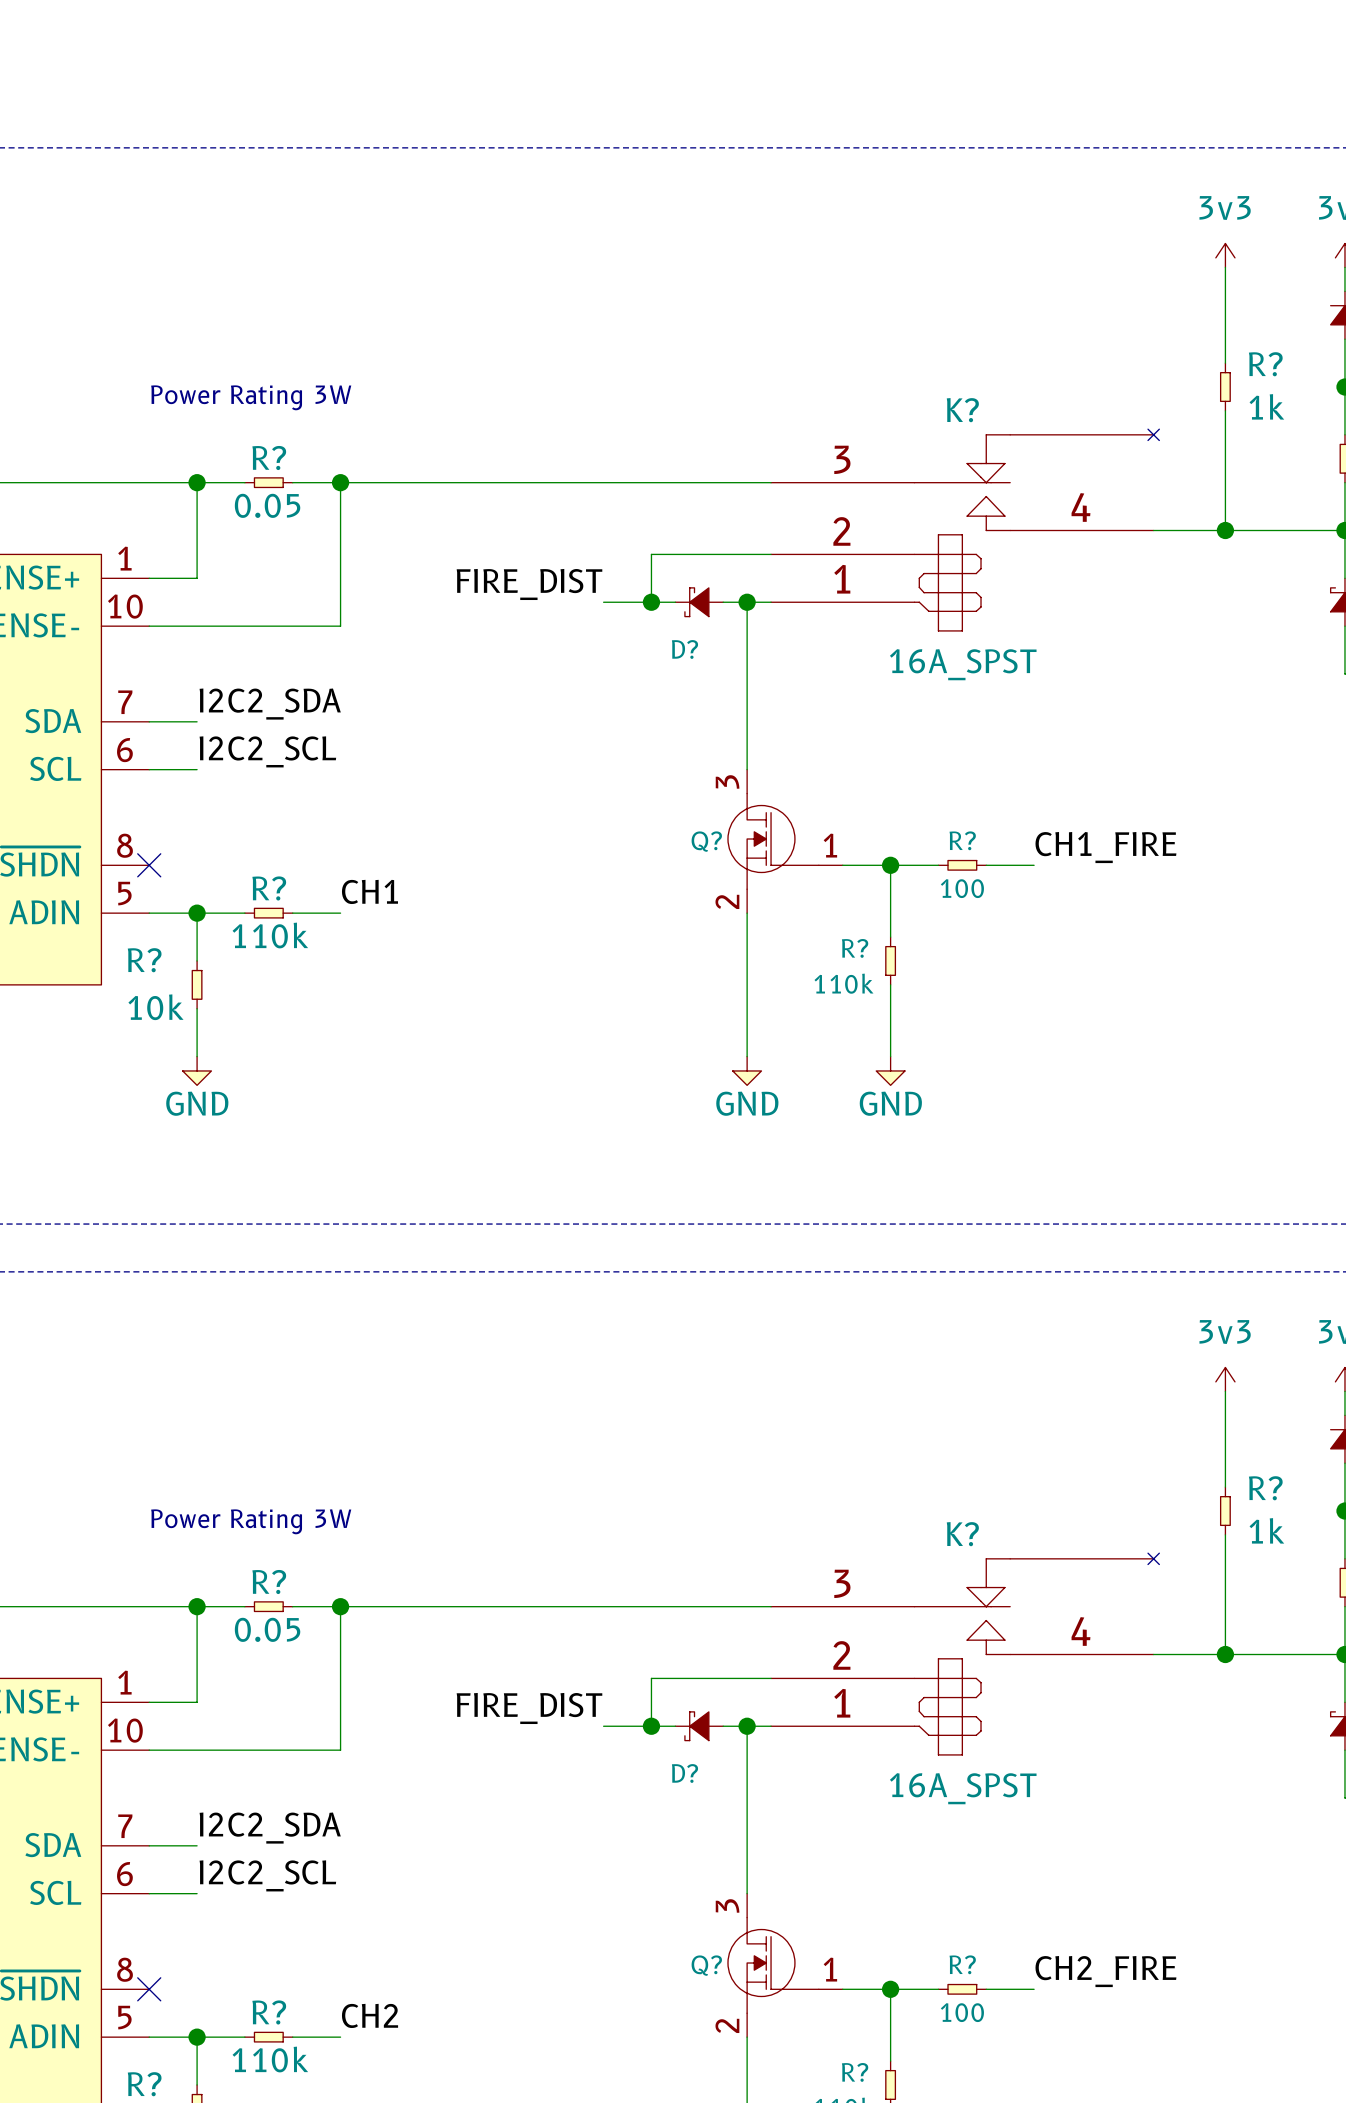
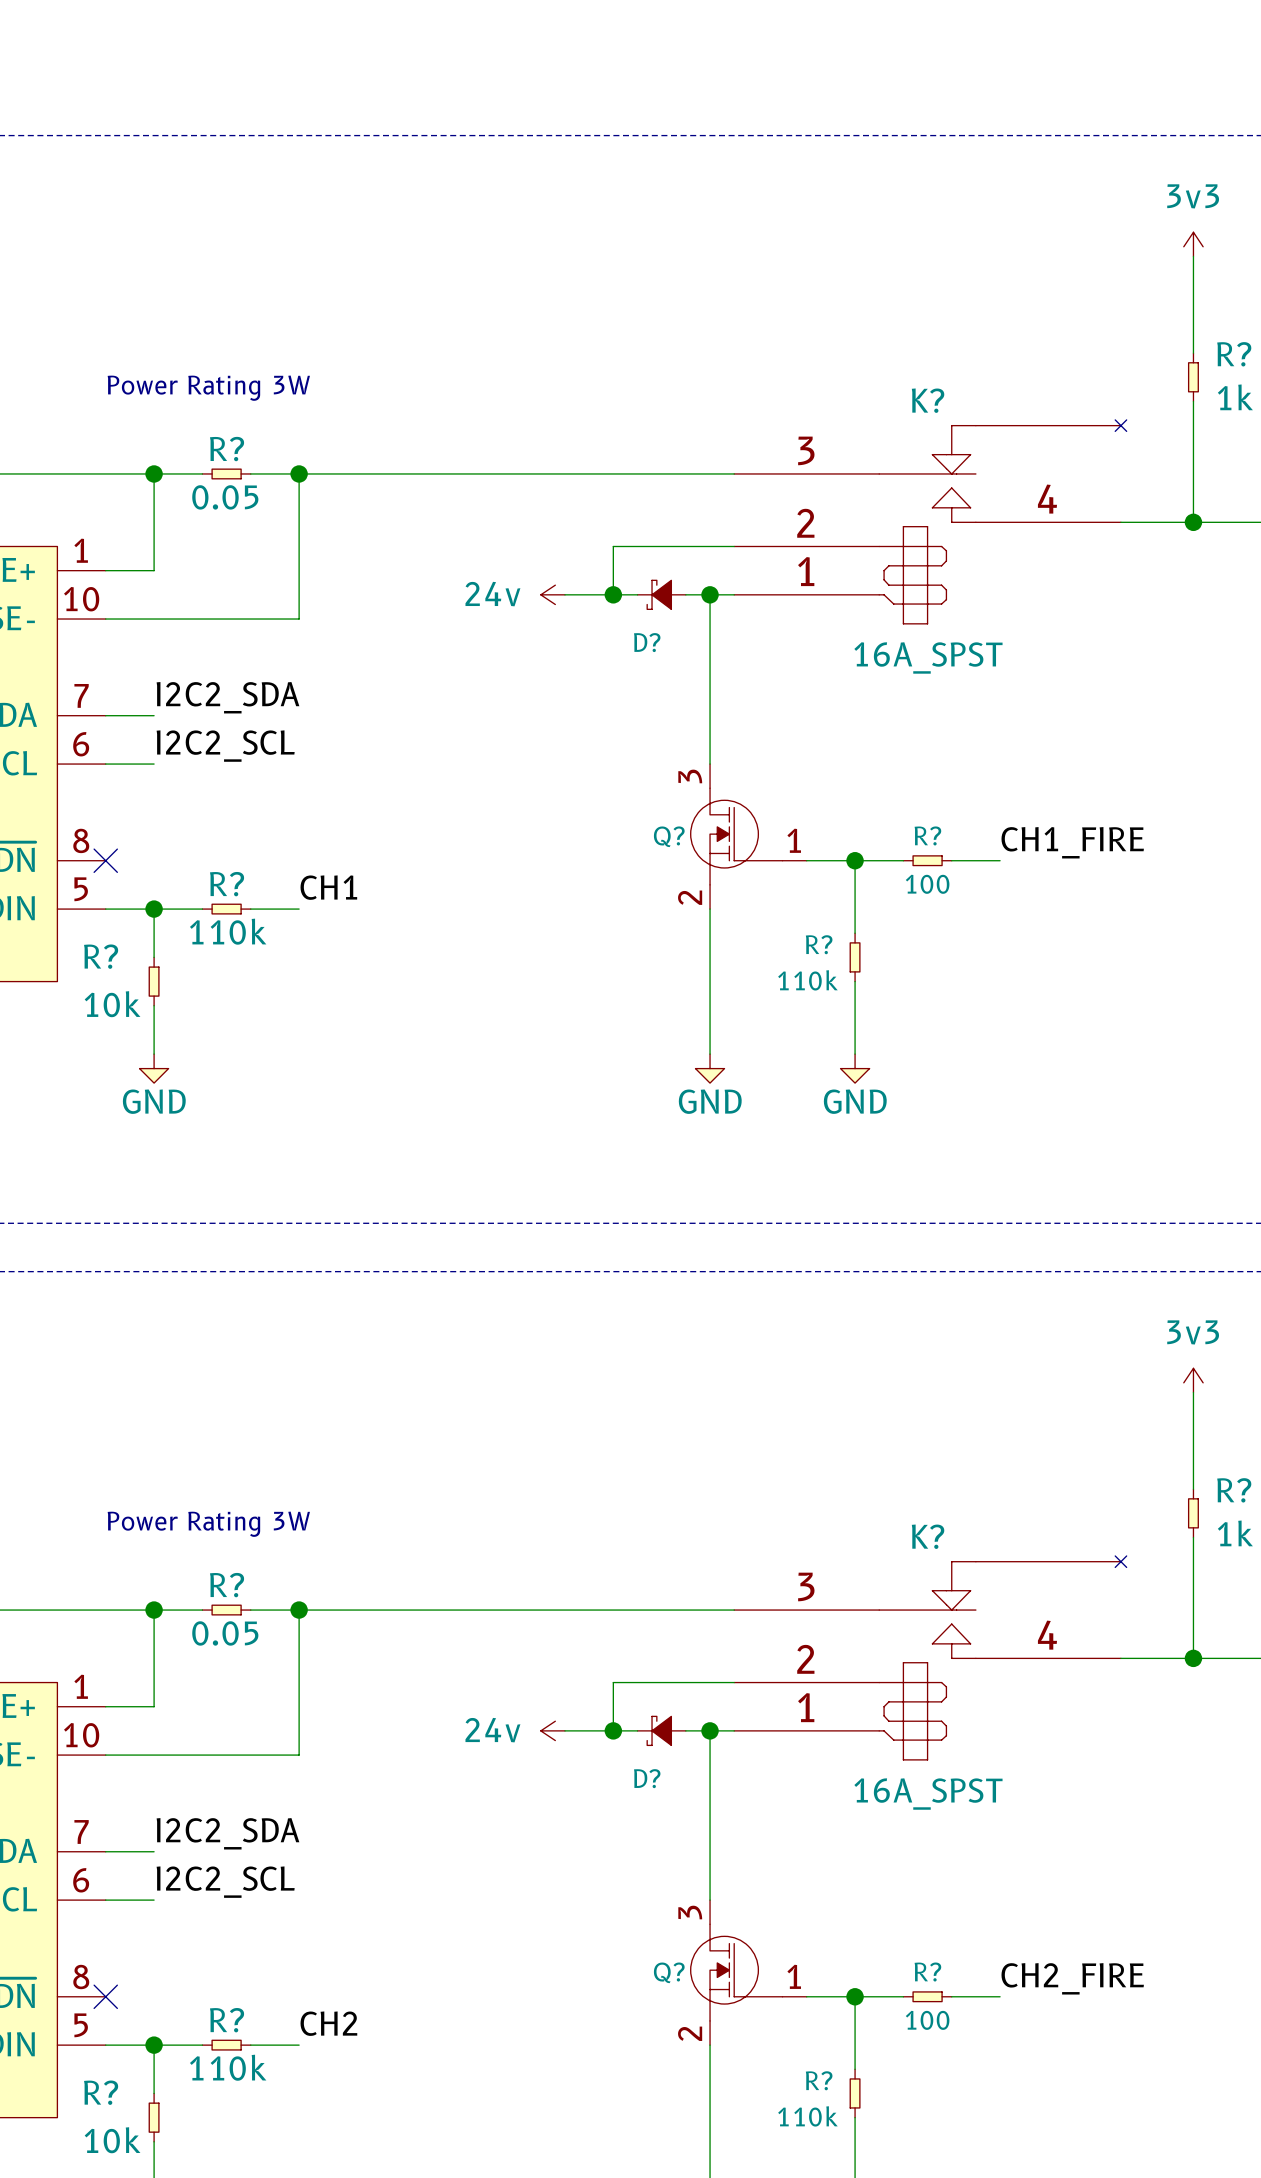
label: FIRE_DIST (529, 584) -> none
power symbol: none -> 24v (552, 594)
label: FIRE_DIST (529, 1708) -> none
power symbol: none -> 24v (552, 1730)

